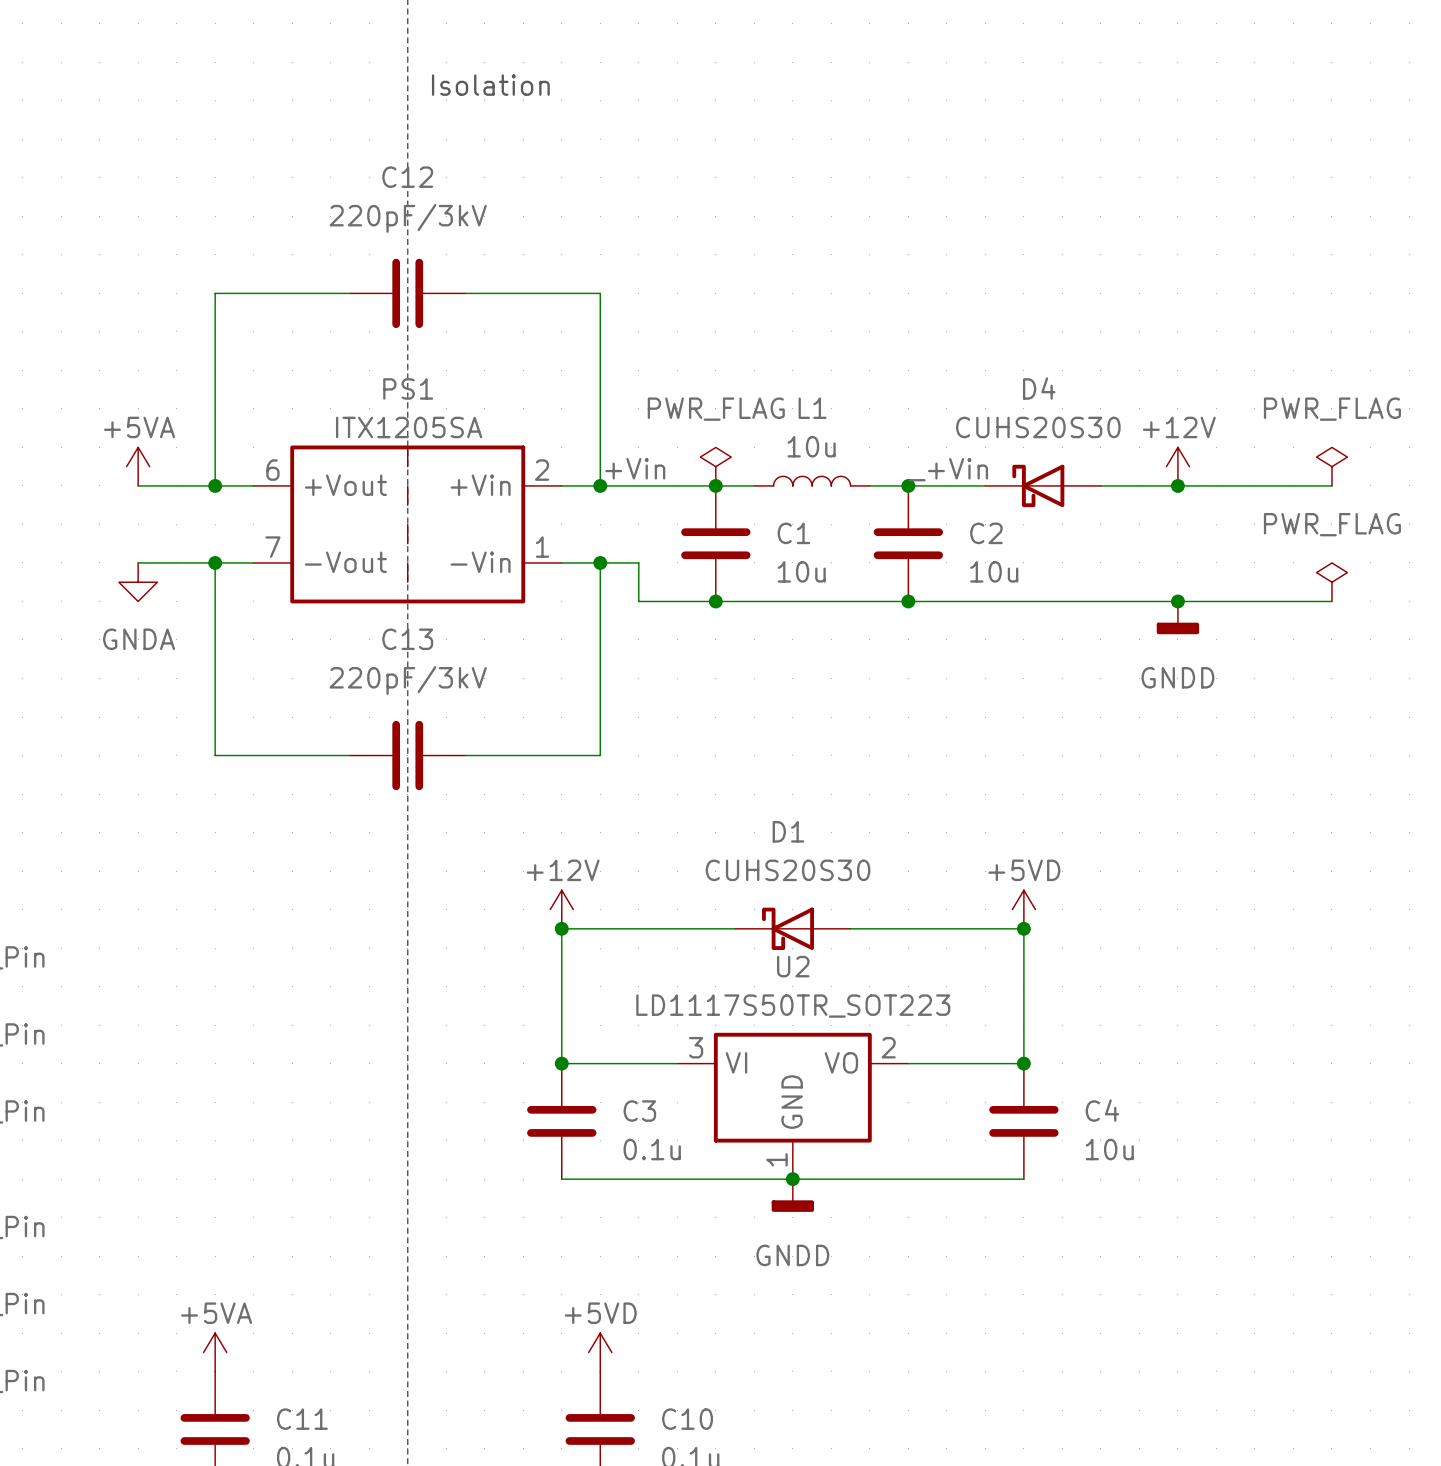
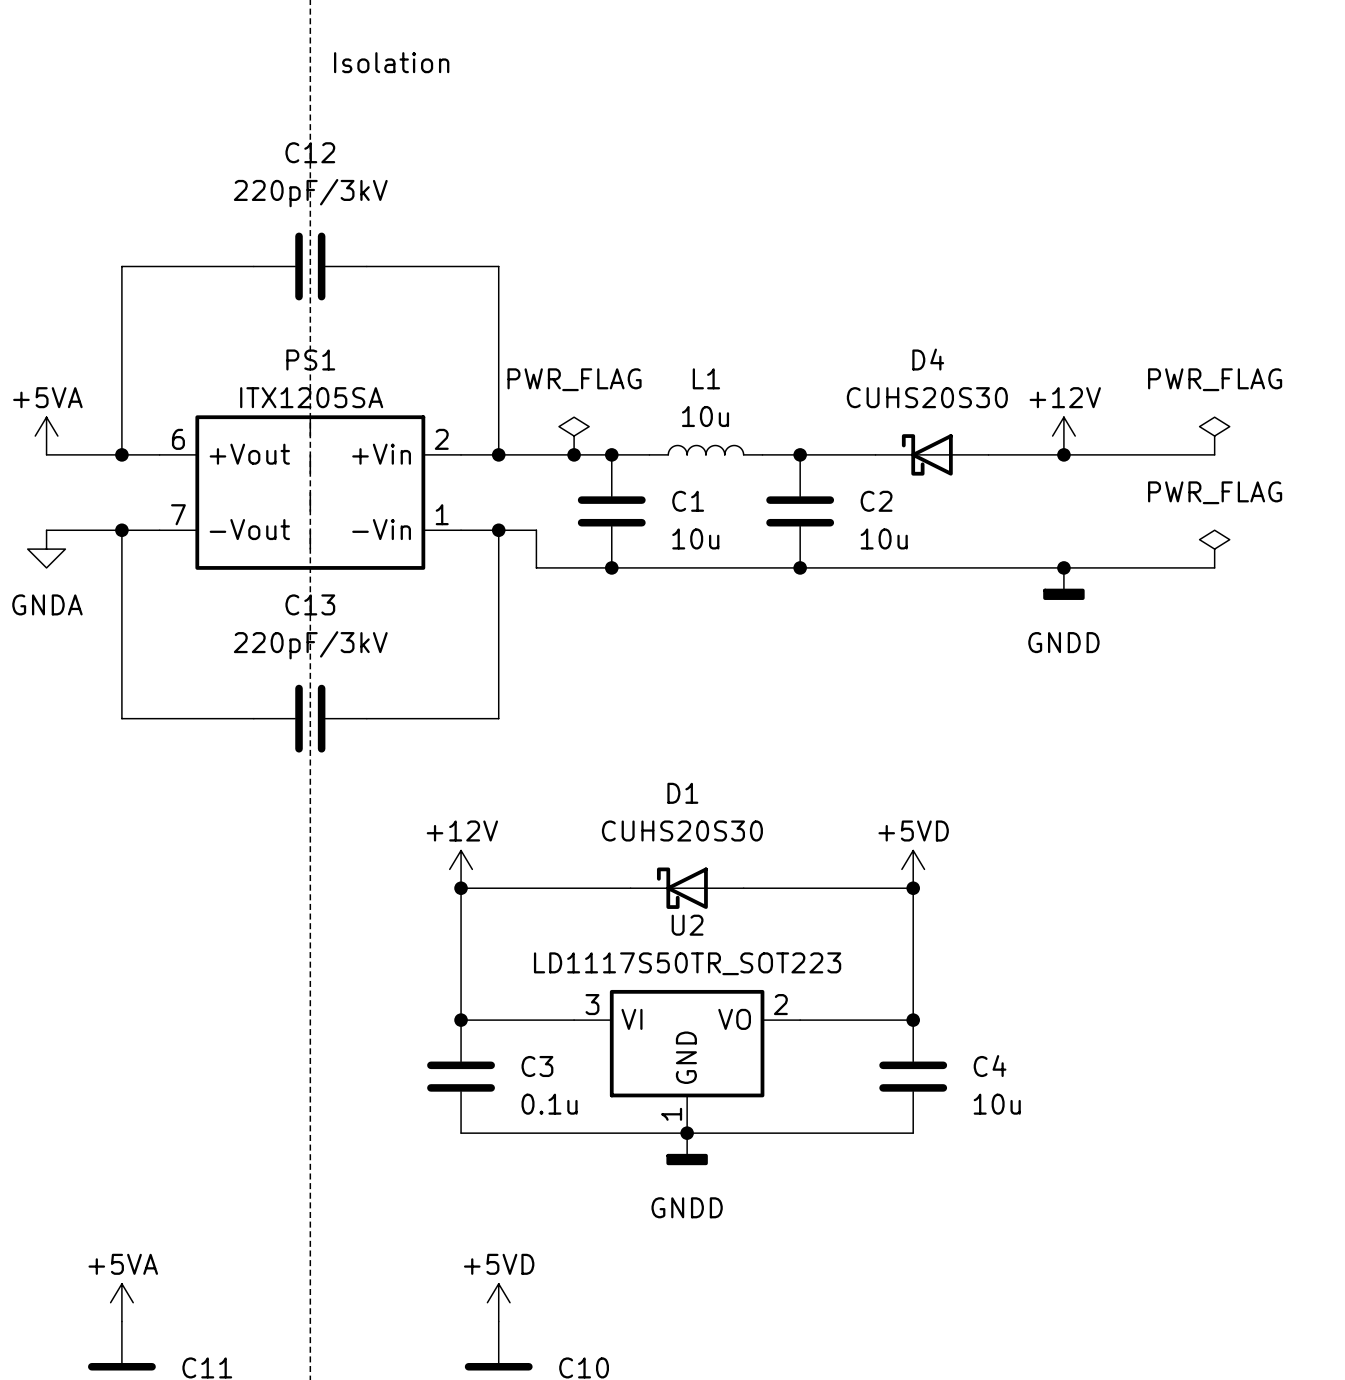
power symbol position: PWR_FLAG (715, 466) -> PWR_FLAG (574, 436)
label: +Vin (635, 468) -> none
label: _+Vin (948, 469) -> none
junction: none -> (574, 454)

